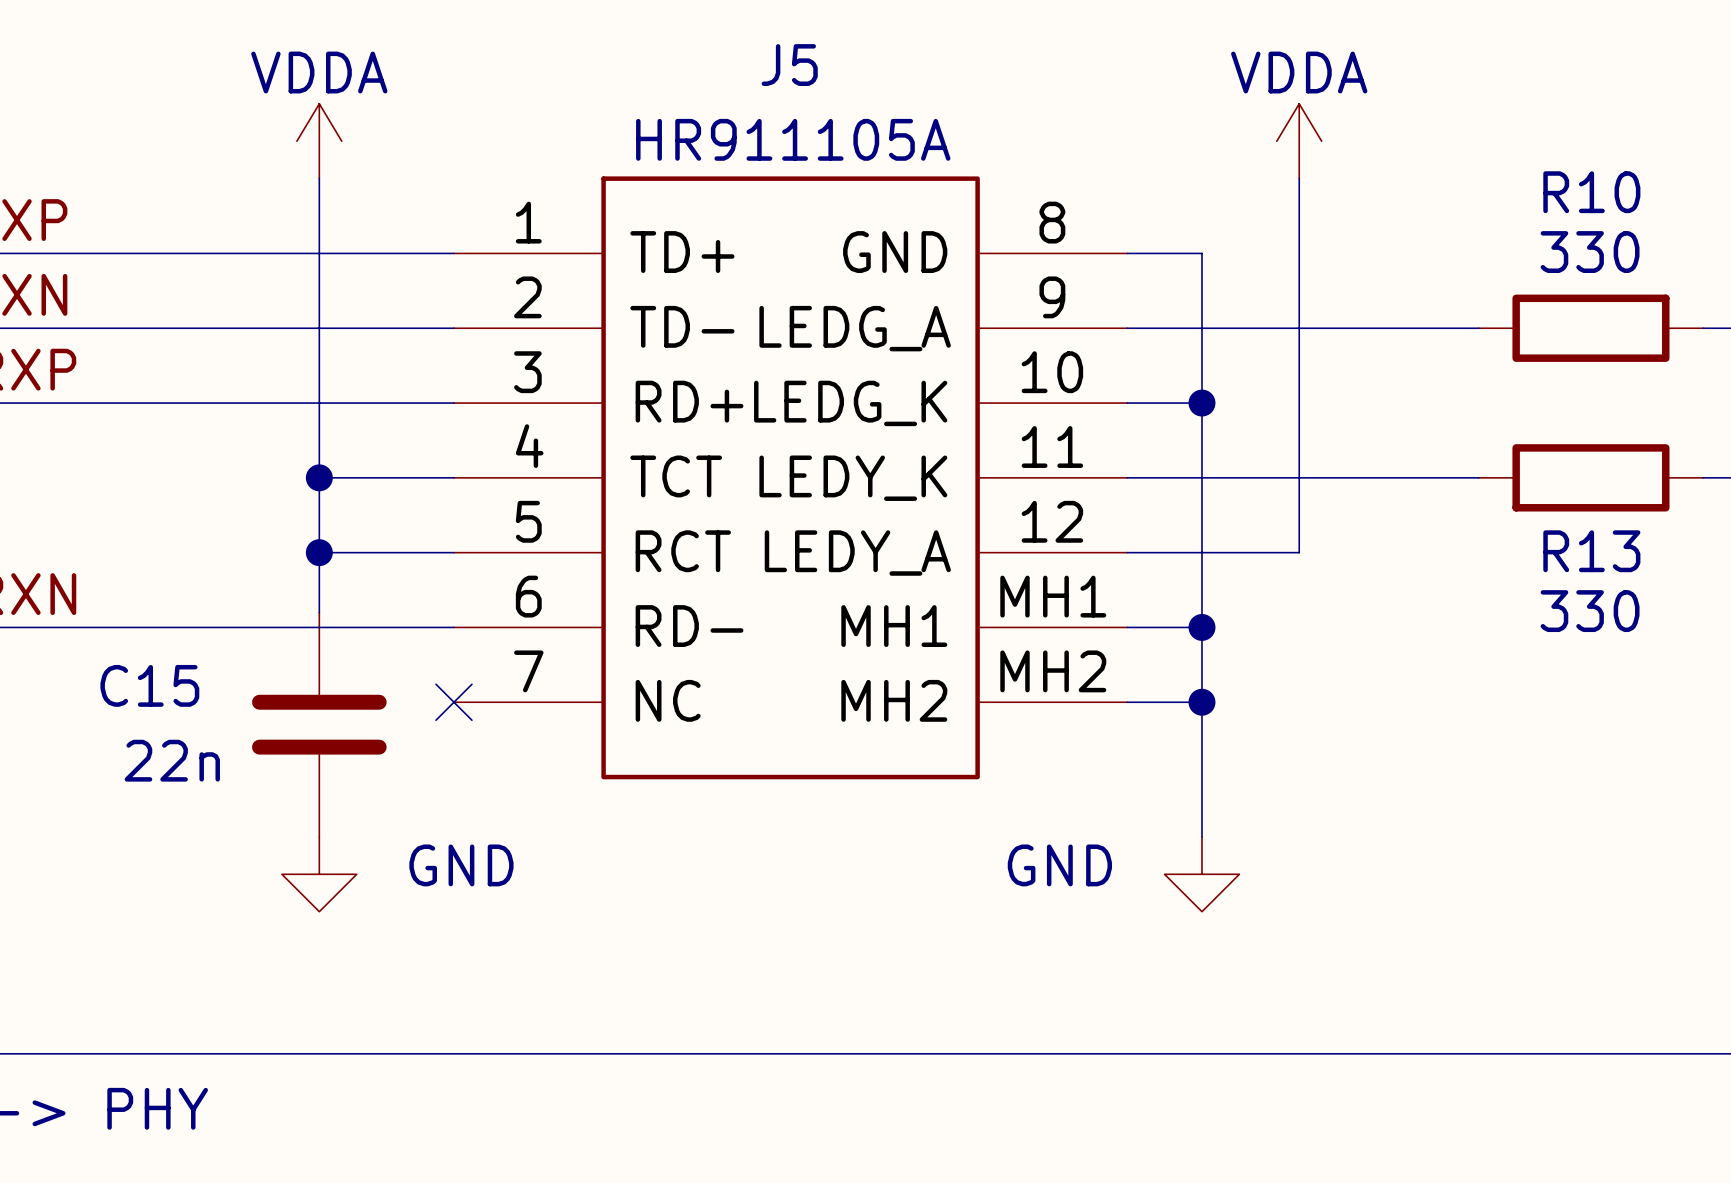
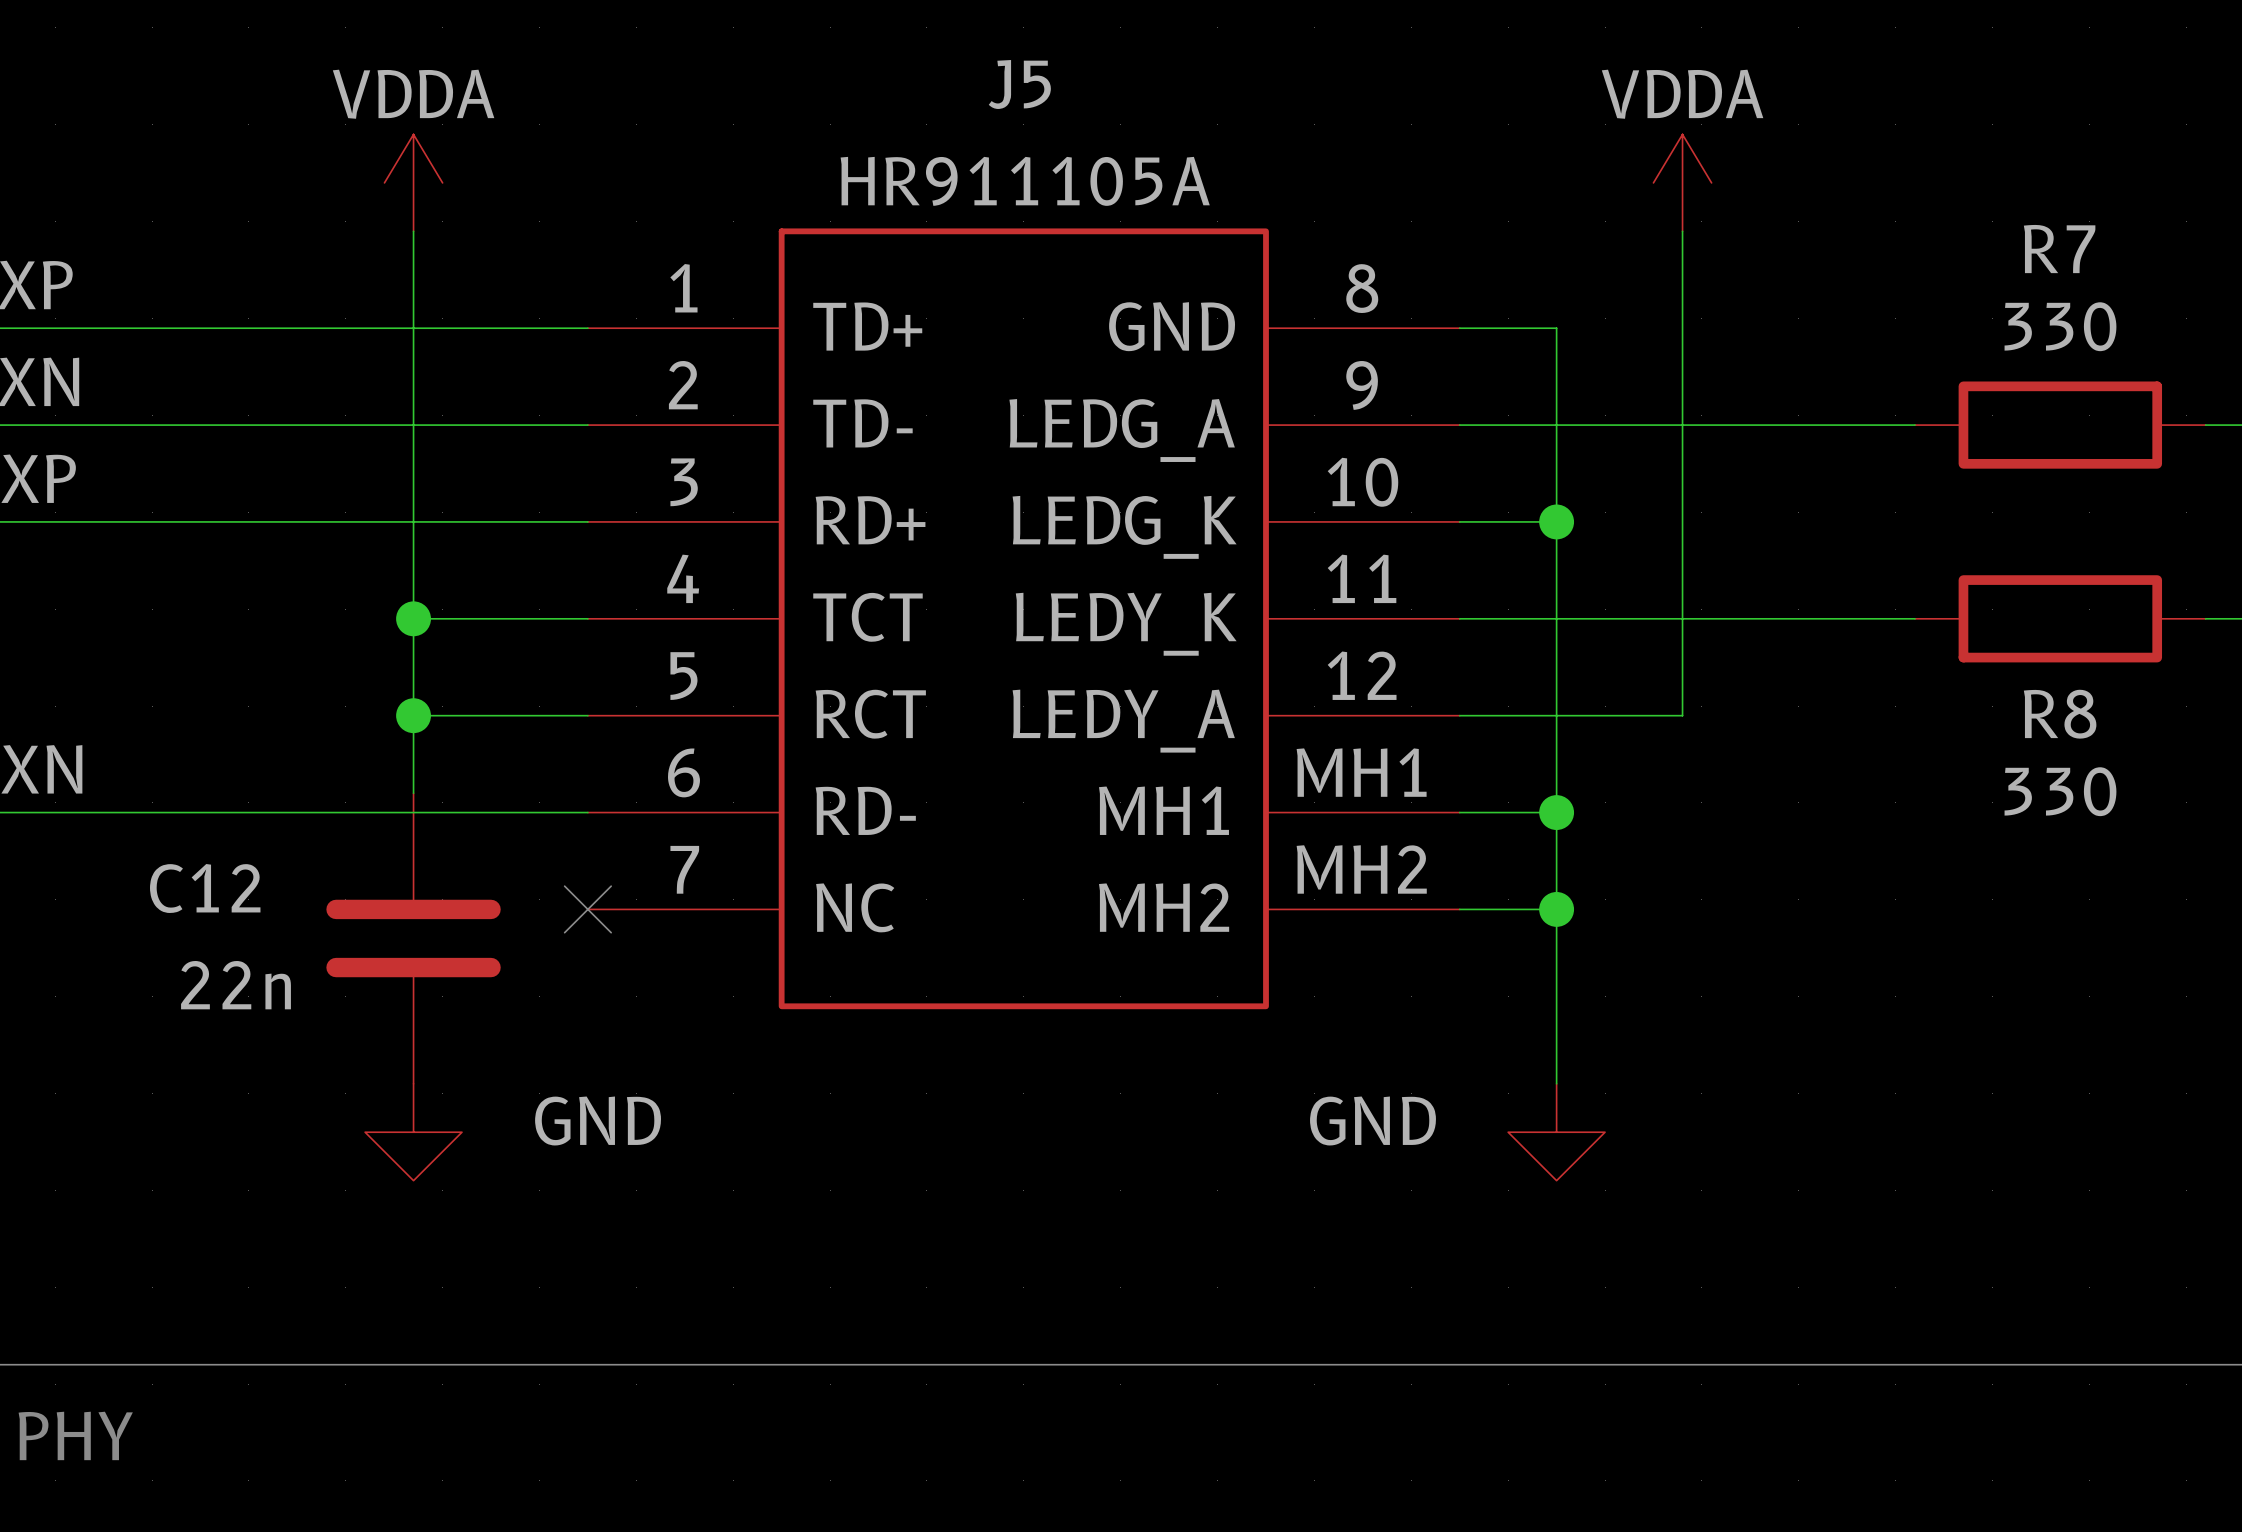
R10 name: R10 (1591, 192) -> R7 (2059, 249)
R13 name: R13 (1591, 551) -> R8 (2060, 714)
C15 name: C15 (149, 685) -> C12 (205, 888)

